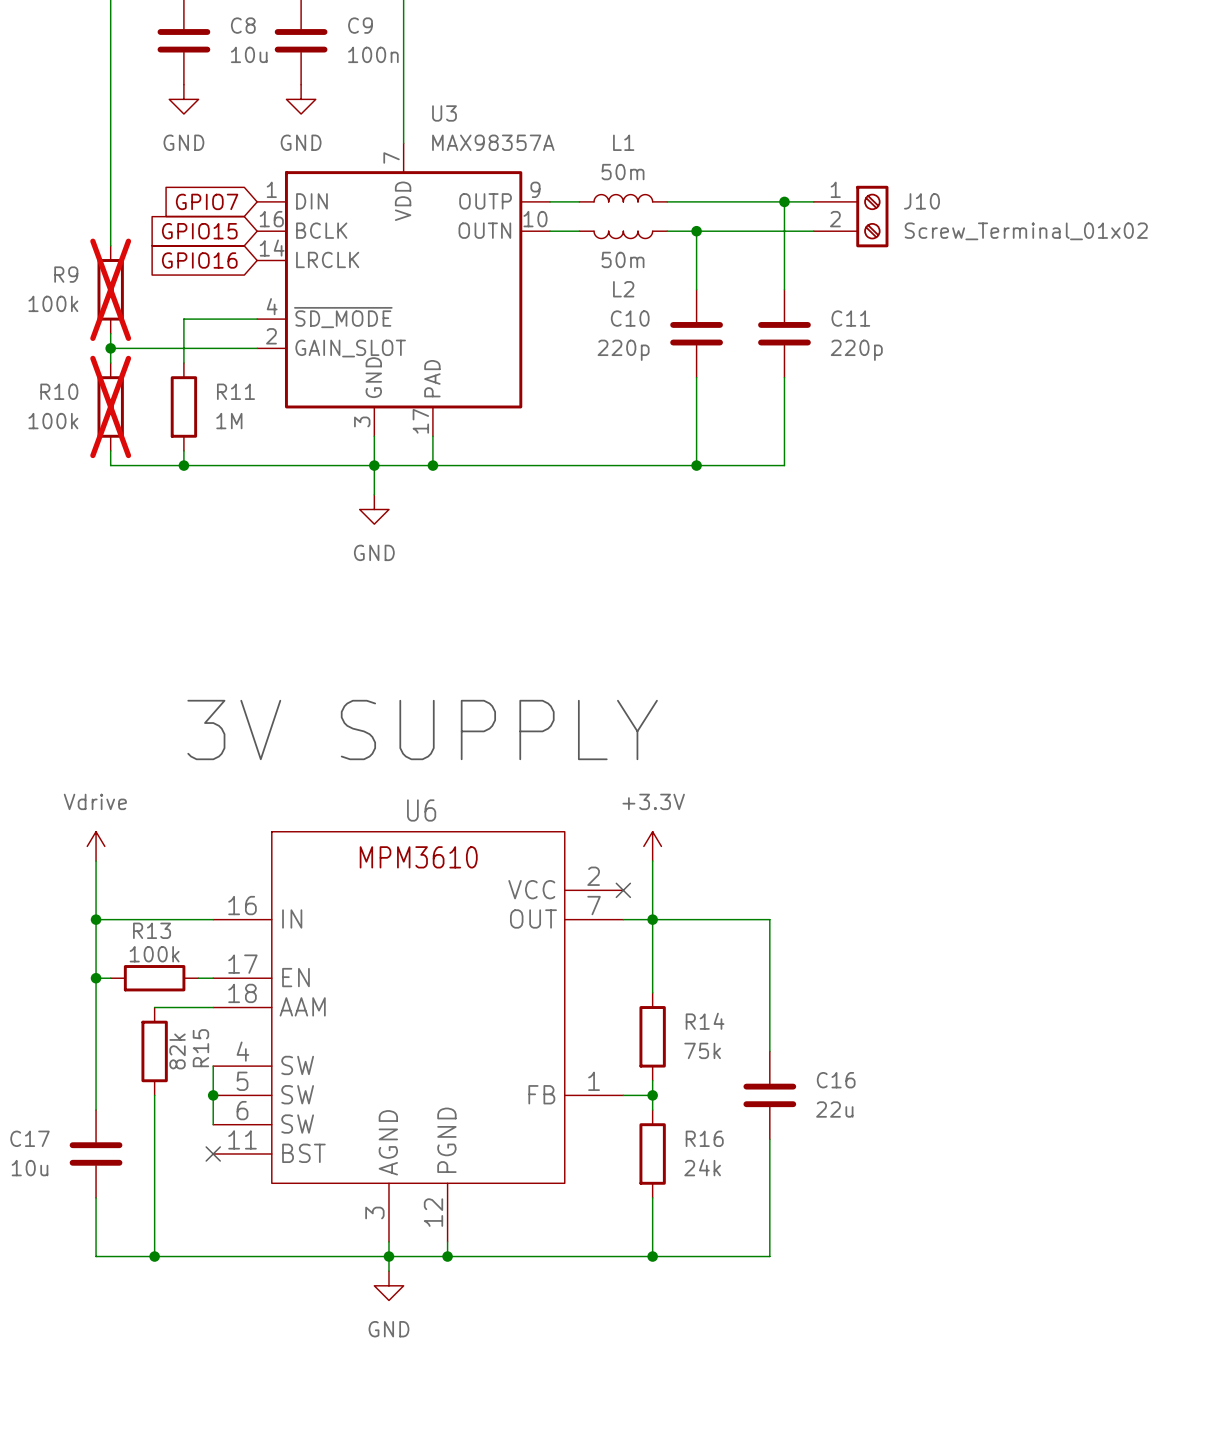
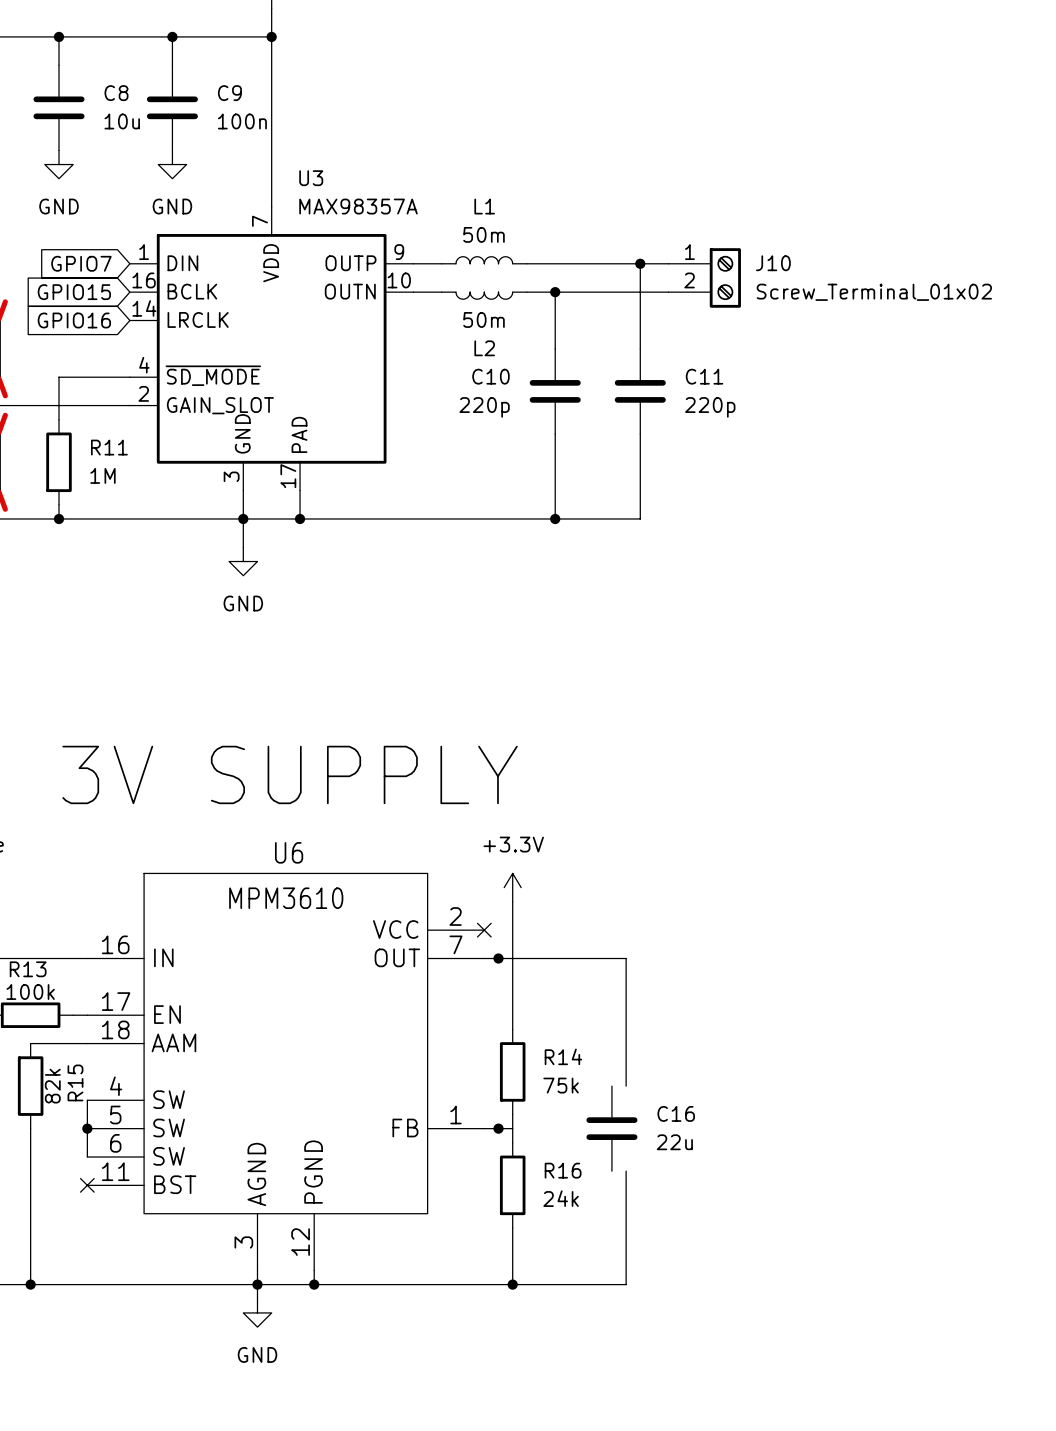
junction position: (652, 919) -> (498, 958)
junction position: (652, 1095) -> (498, 1128)
C16 position: (769, 1095) -> (611, 1128)

